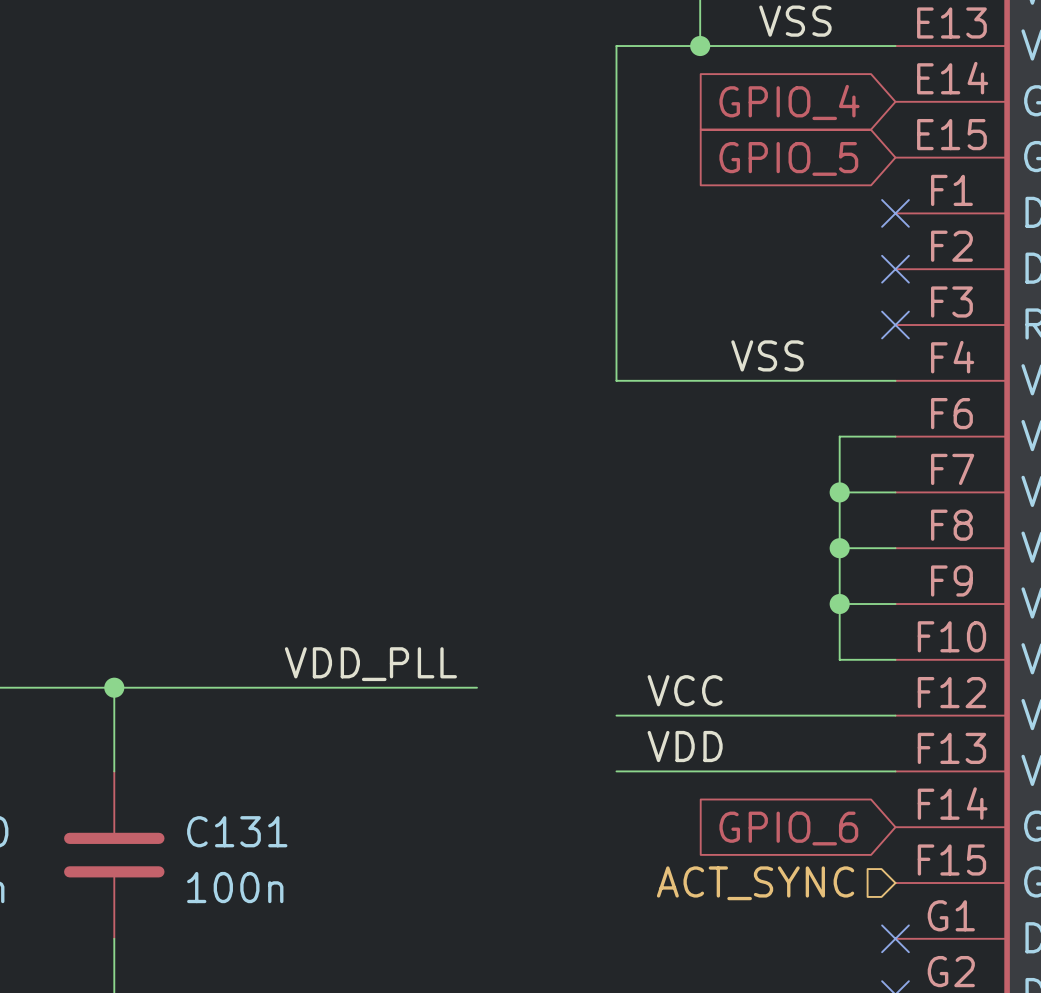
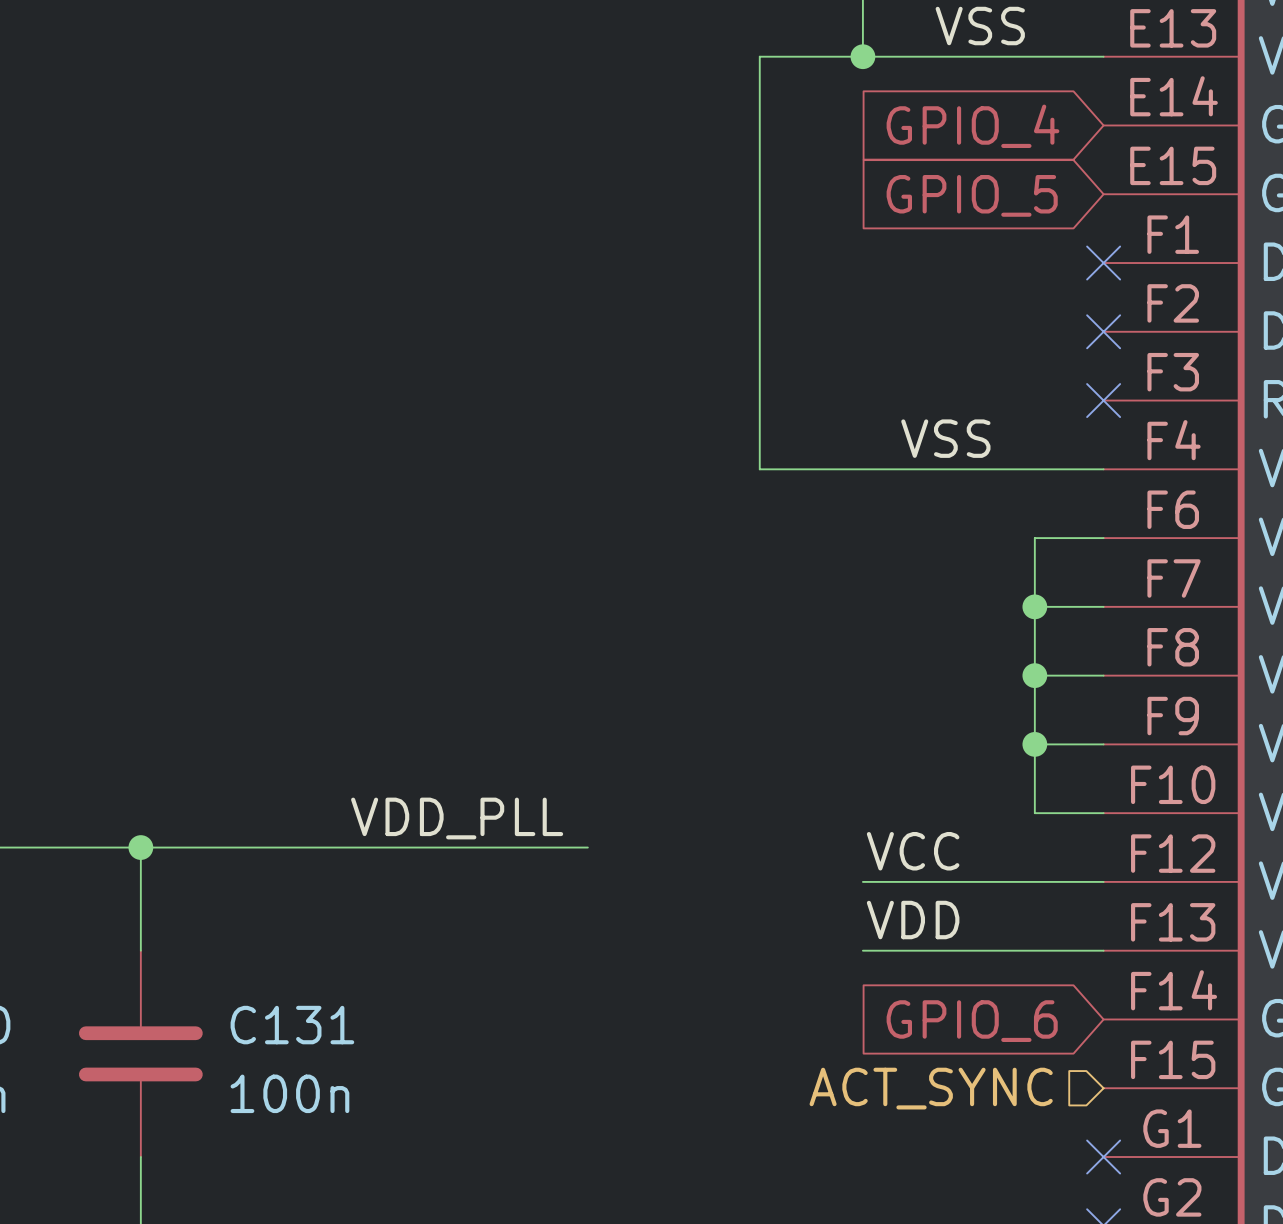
label position: VCC (685, 690) -> VCC (913, 851)
wire: (616, 715) (700, 715) -> none
label position: VDD (685, 746) -> VDD (913, 920)
wire: (616, 771) (700, 771) -> none

